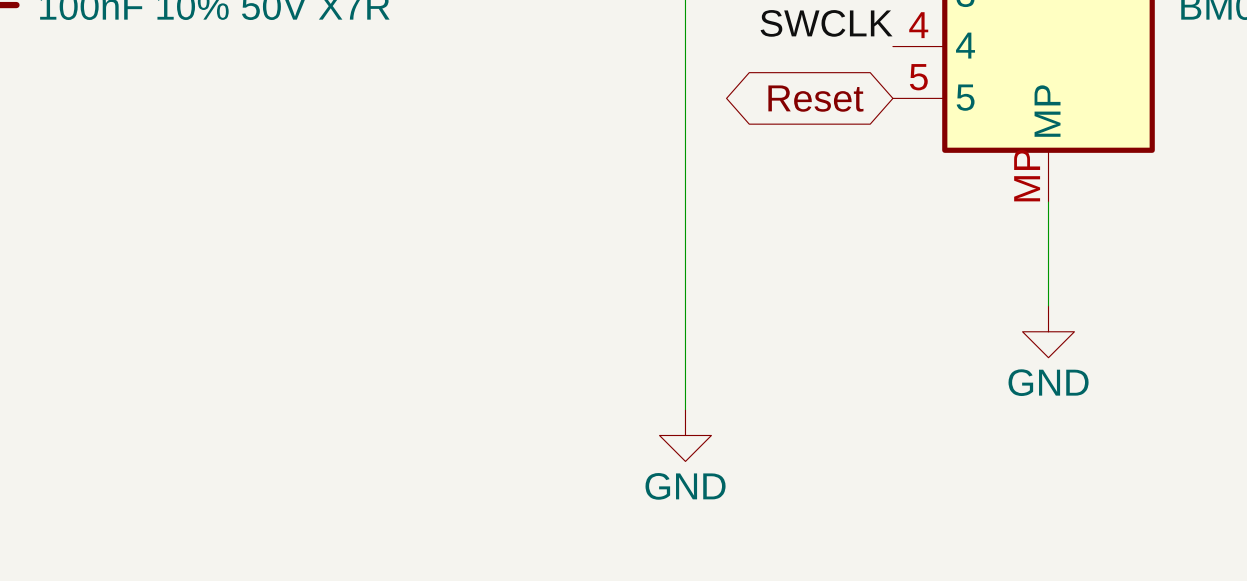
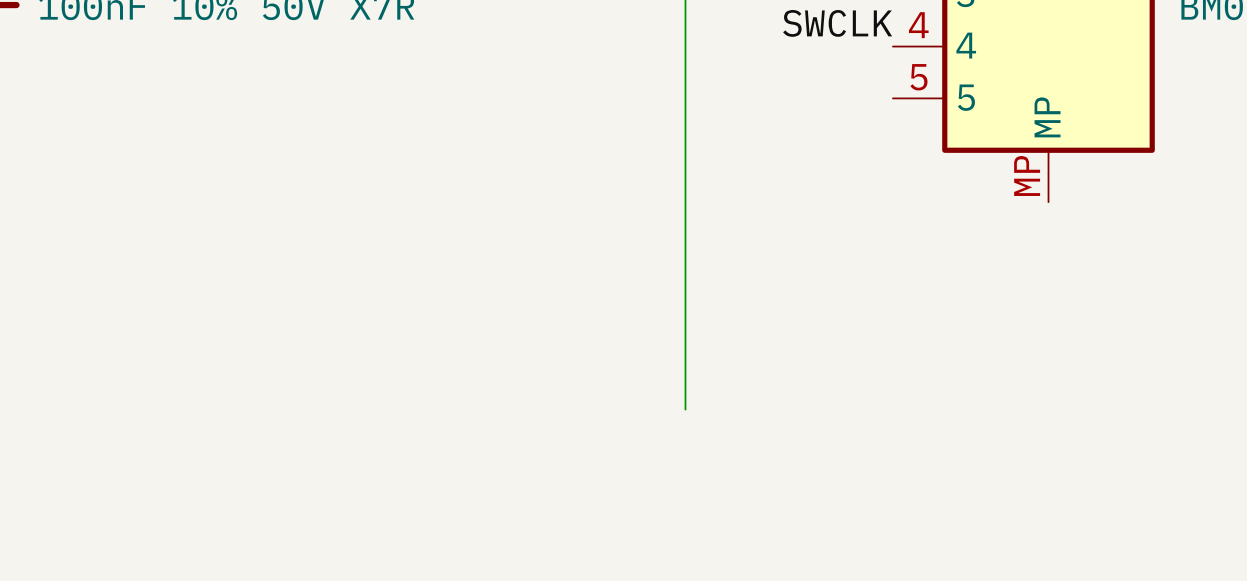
global label: Reset (815, 98) -> none
wire: (1048, 202) (1048, 305) -> none
power symbol: GND (1048, 331) -> none
power symbol: GND (685, 435) -> none

